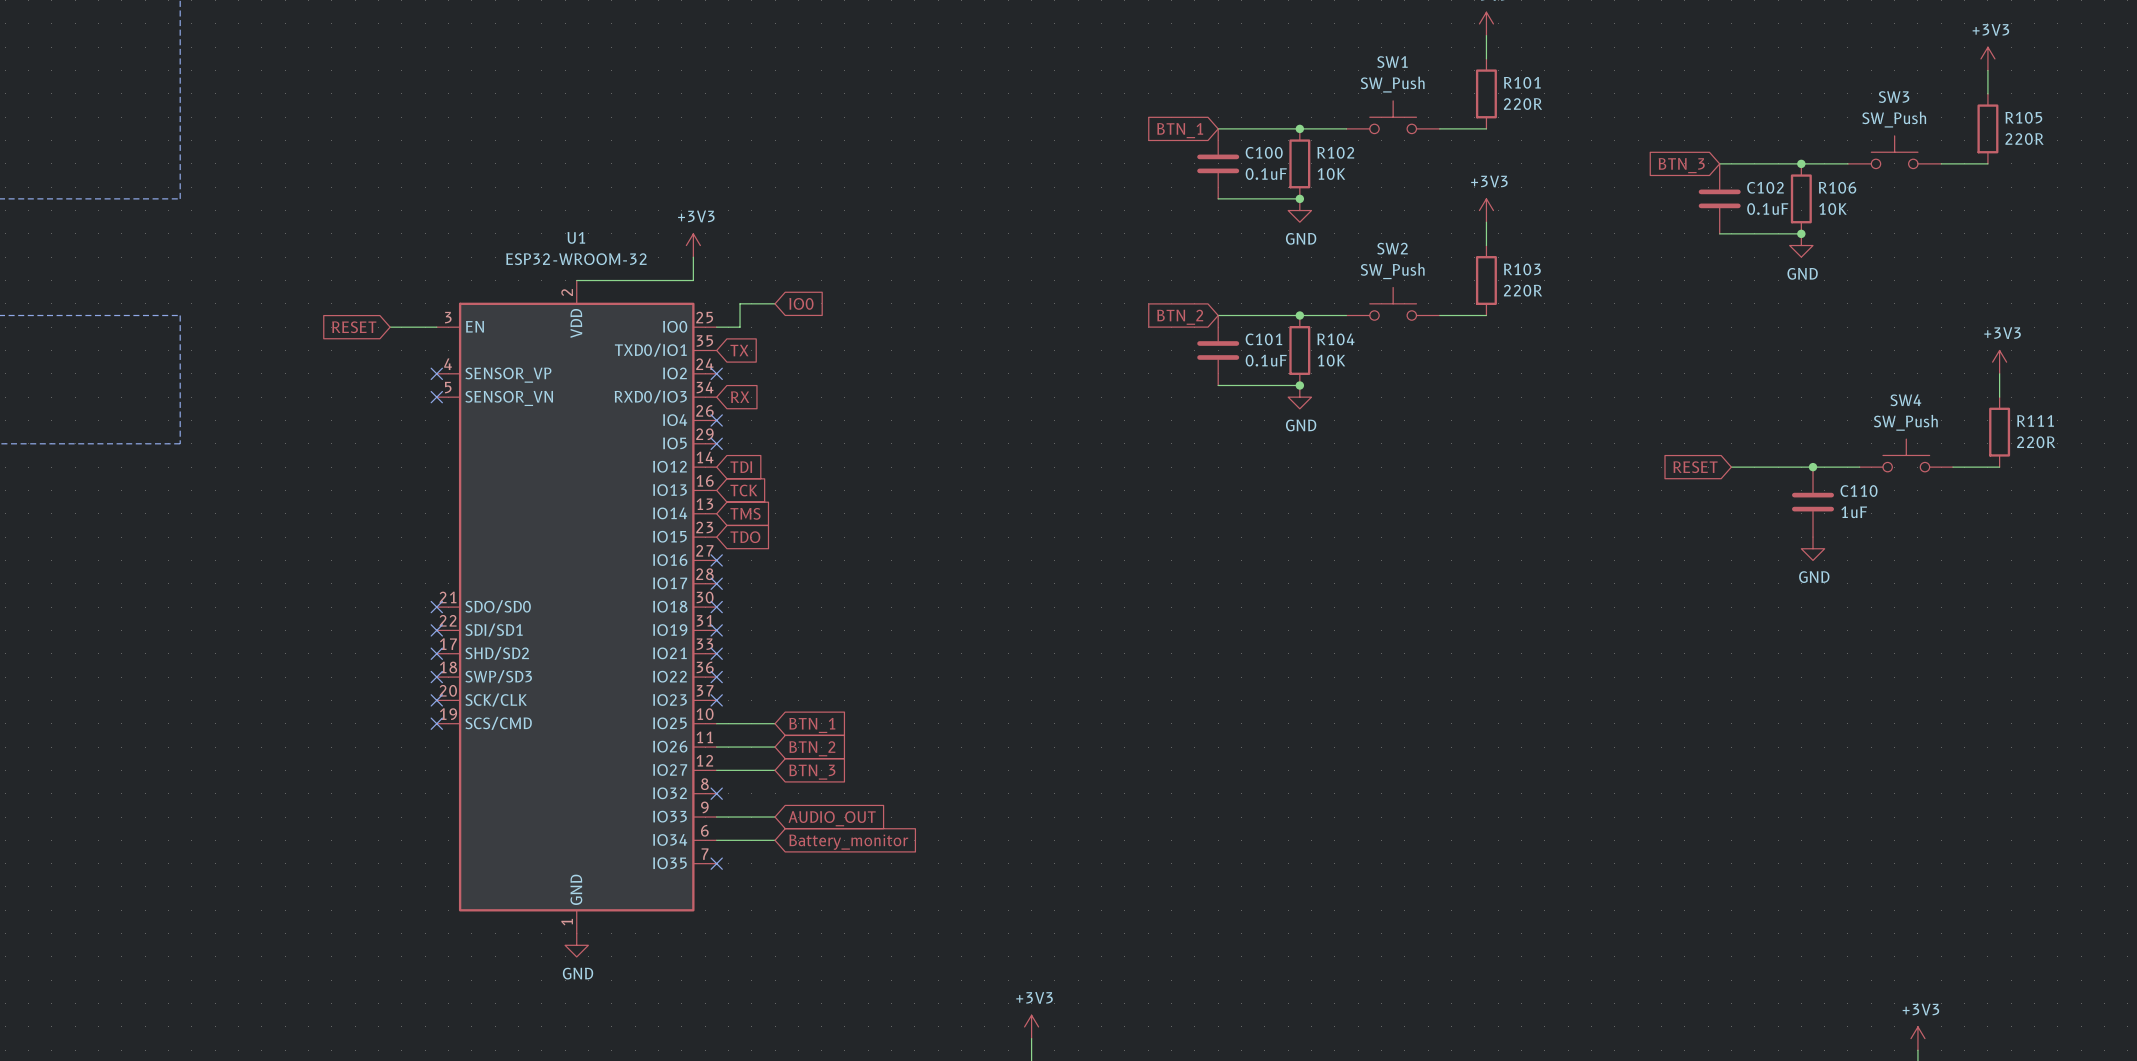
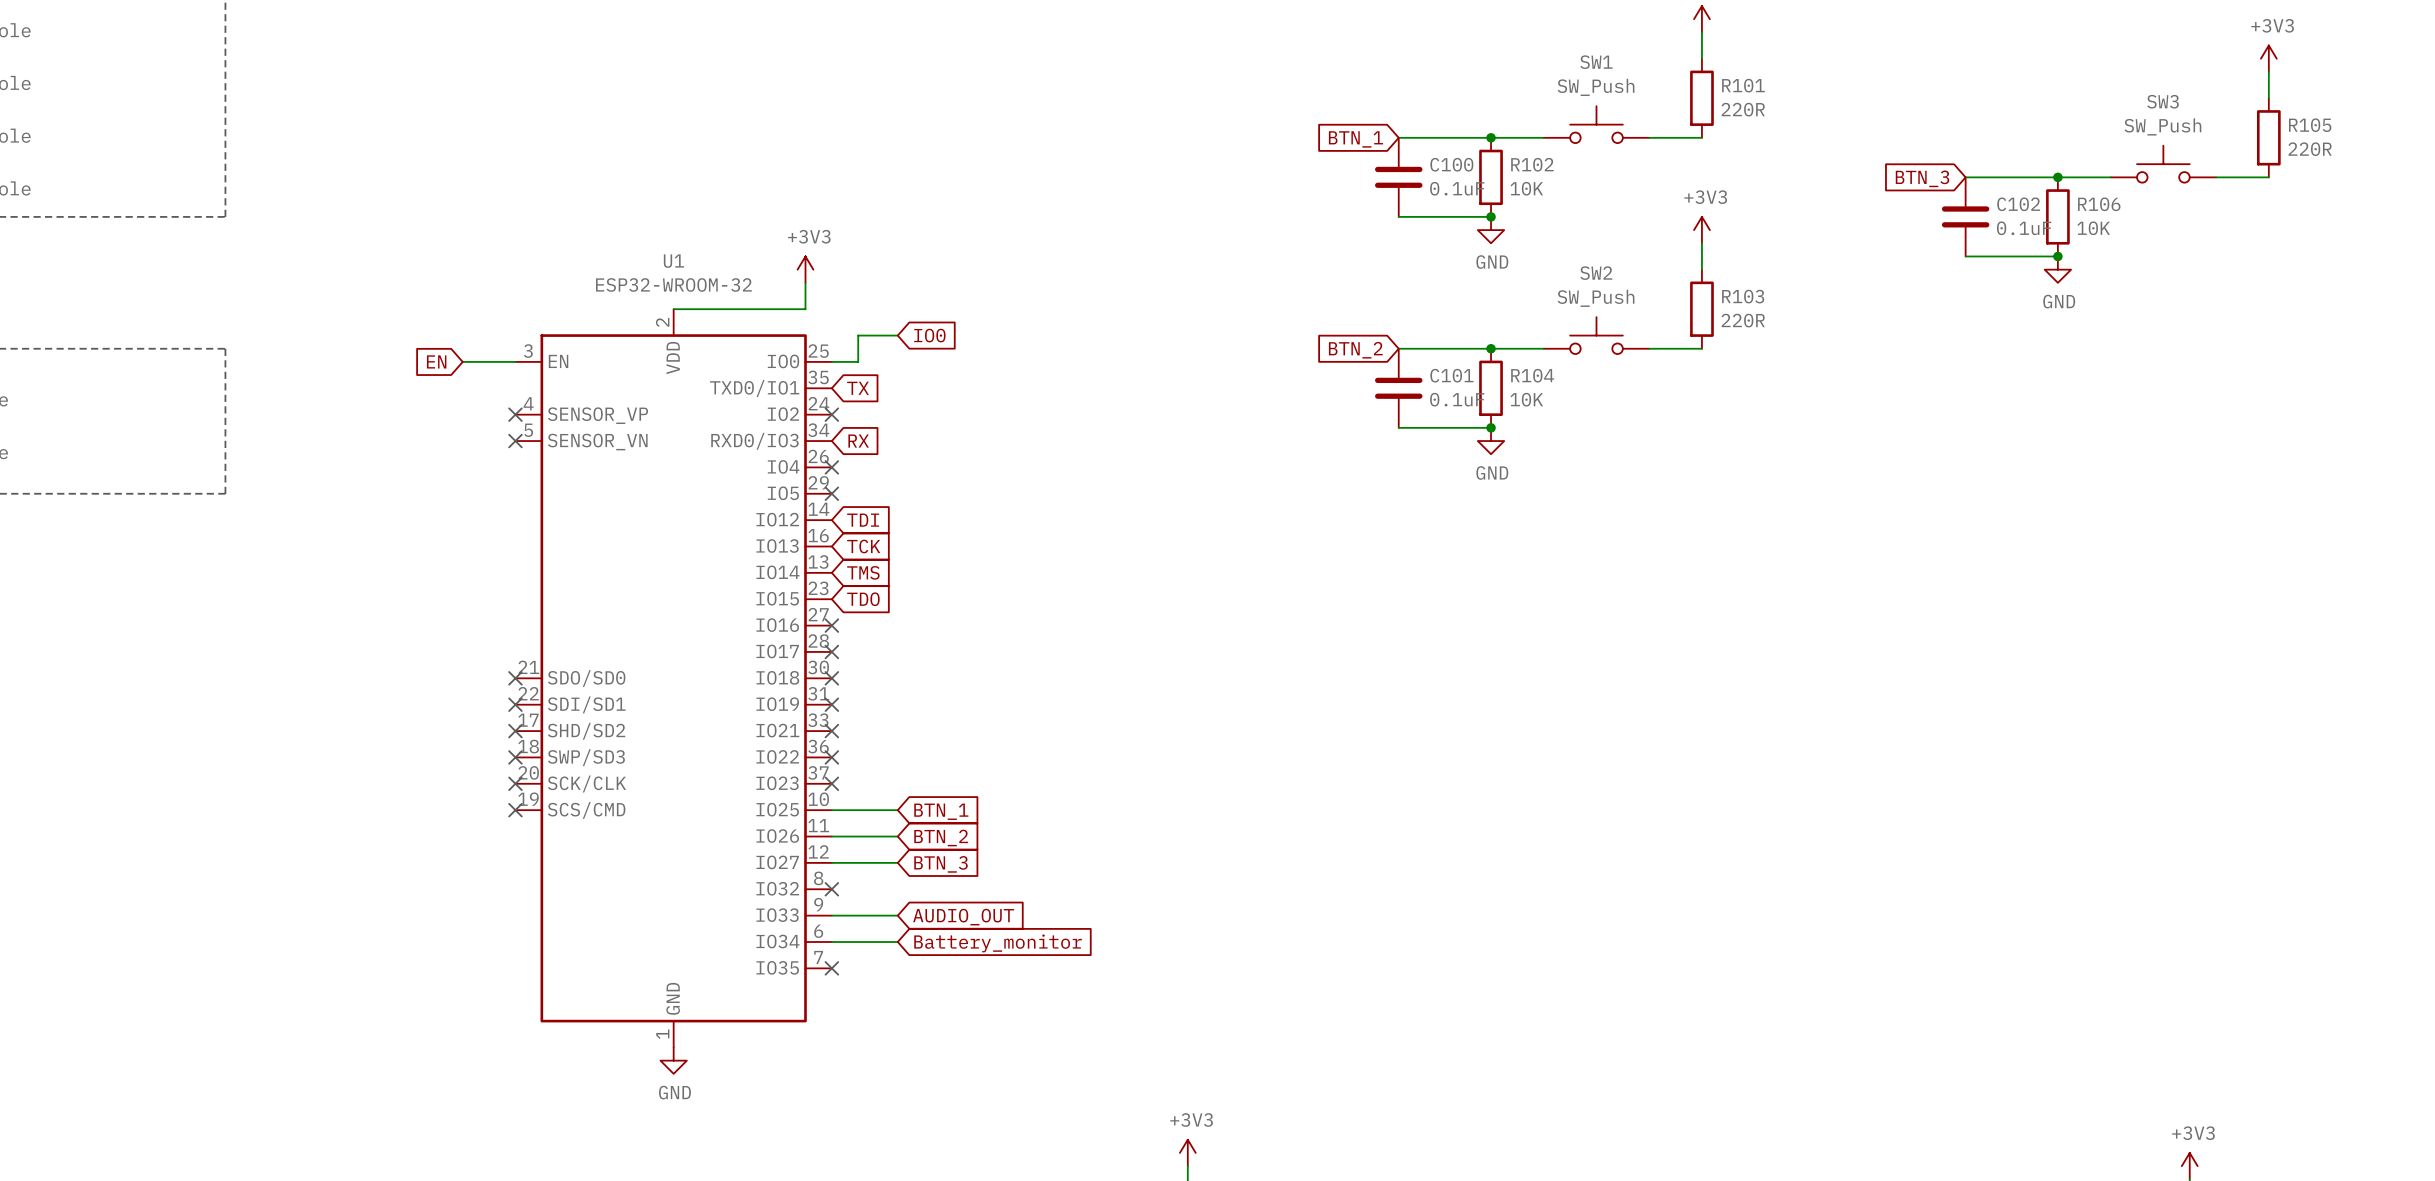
global label: RESET (354, 327) -> EN (436, 361)
power symbol: +3V3 (1999, 362) -> none
wire: (1999, 373) (1999, 397) -> none
R111: 220R (1999, 432) -> none
SW4: SW_Push (1906, 455) -> none
global label: RESET (1695, 467) -> none
wire: (1731, 467) (1859, 467) -> none
junction: (1813, 467) -> none
wire: (1952, 467) (1999, 467) -> none
C110: 1uF (1813, 502) -> none
power symbol: GND (1813, 548) -> none

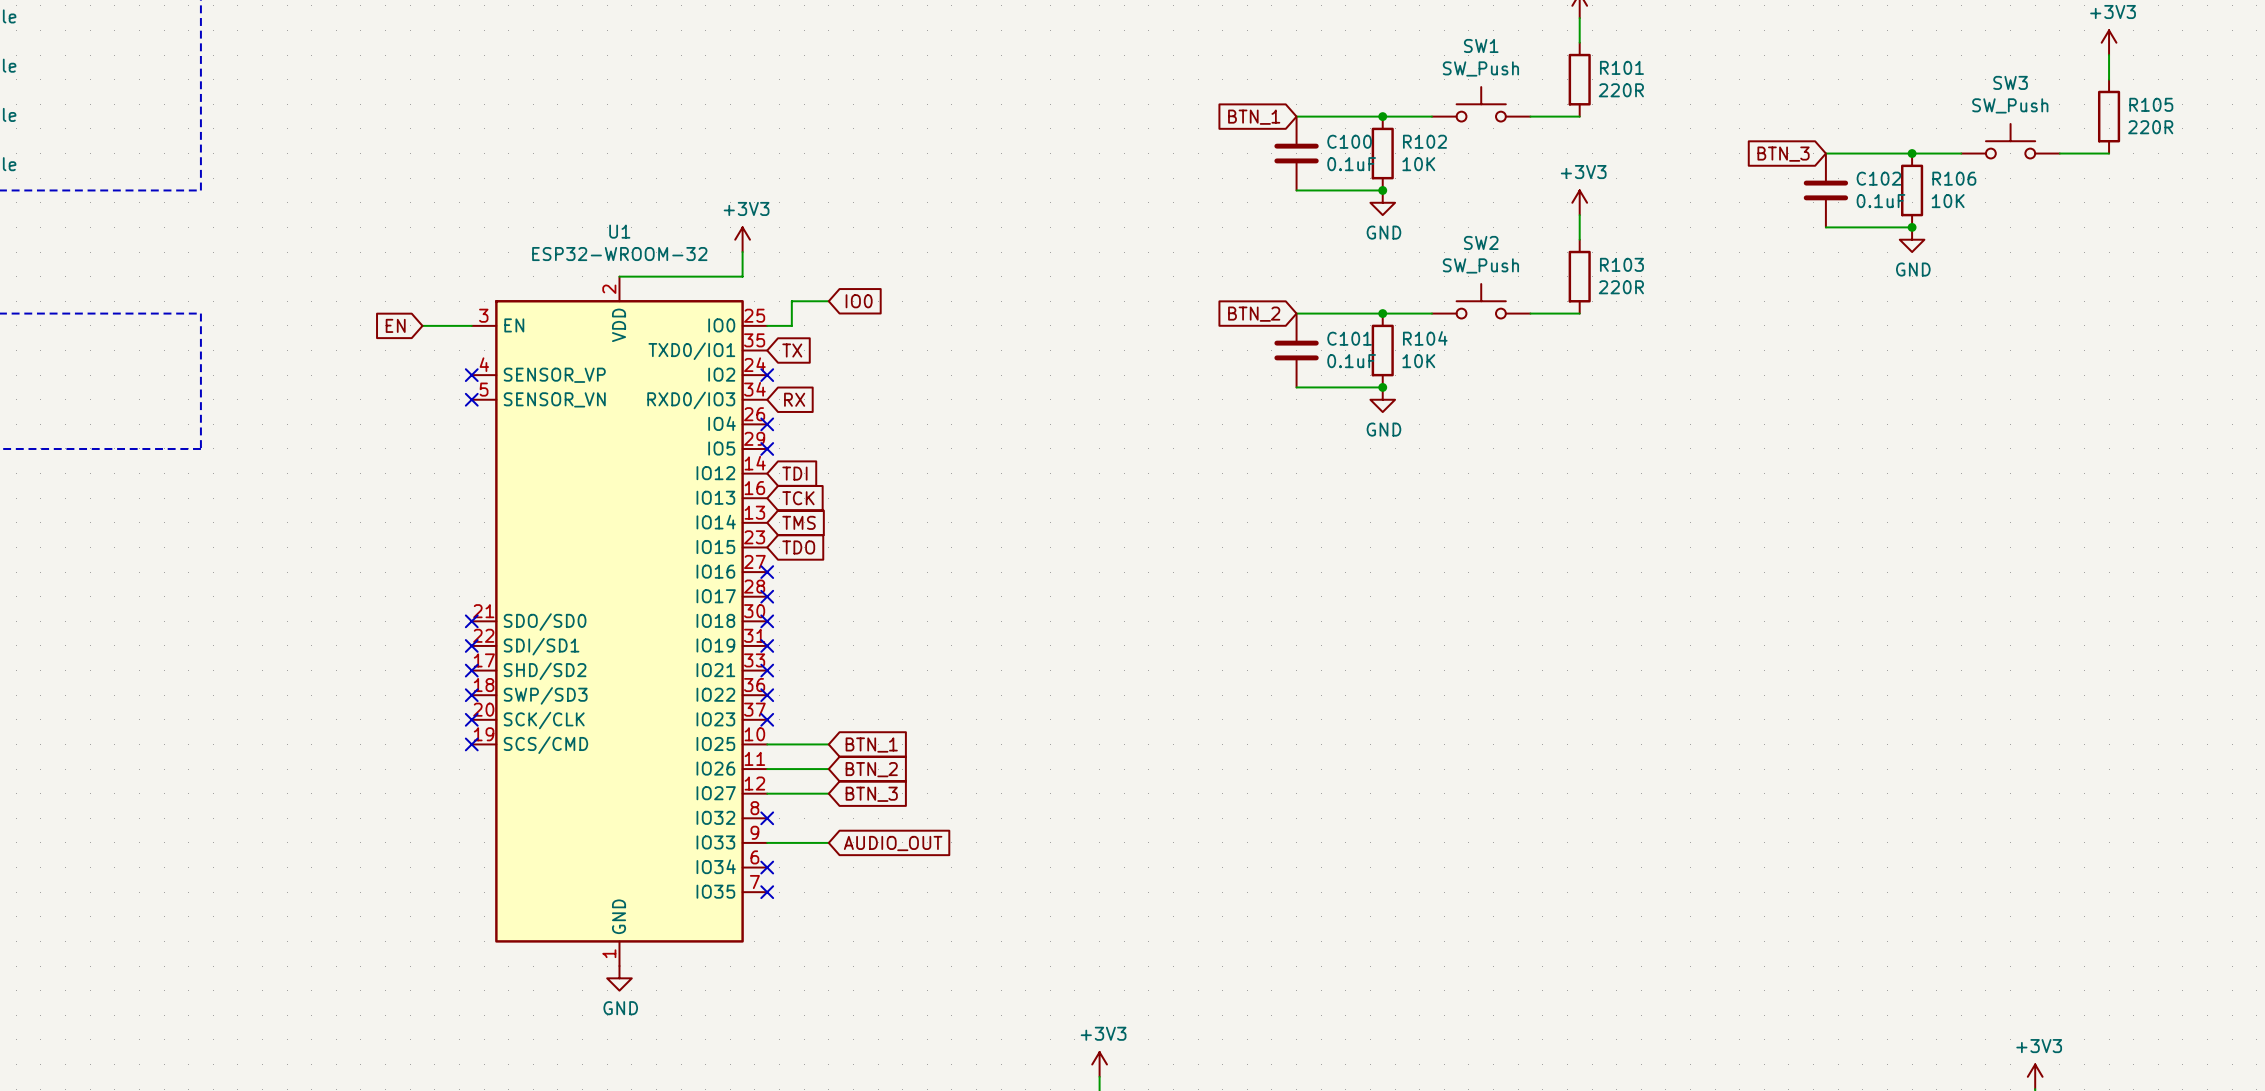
wire: (831, 942) (897, 942) -> none
no-connect mark: none -> (767, 867)
global label: Battery_monitor (998, 943) -> none

